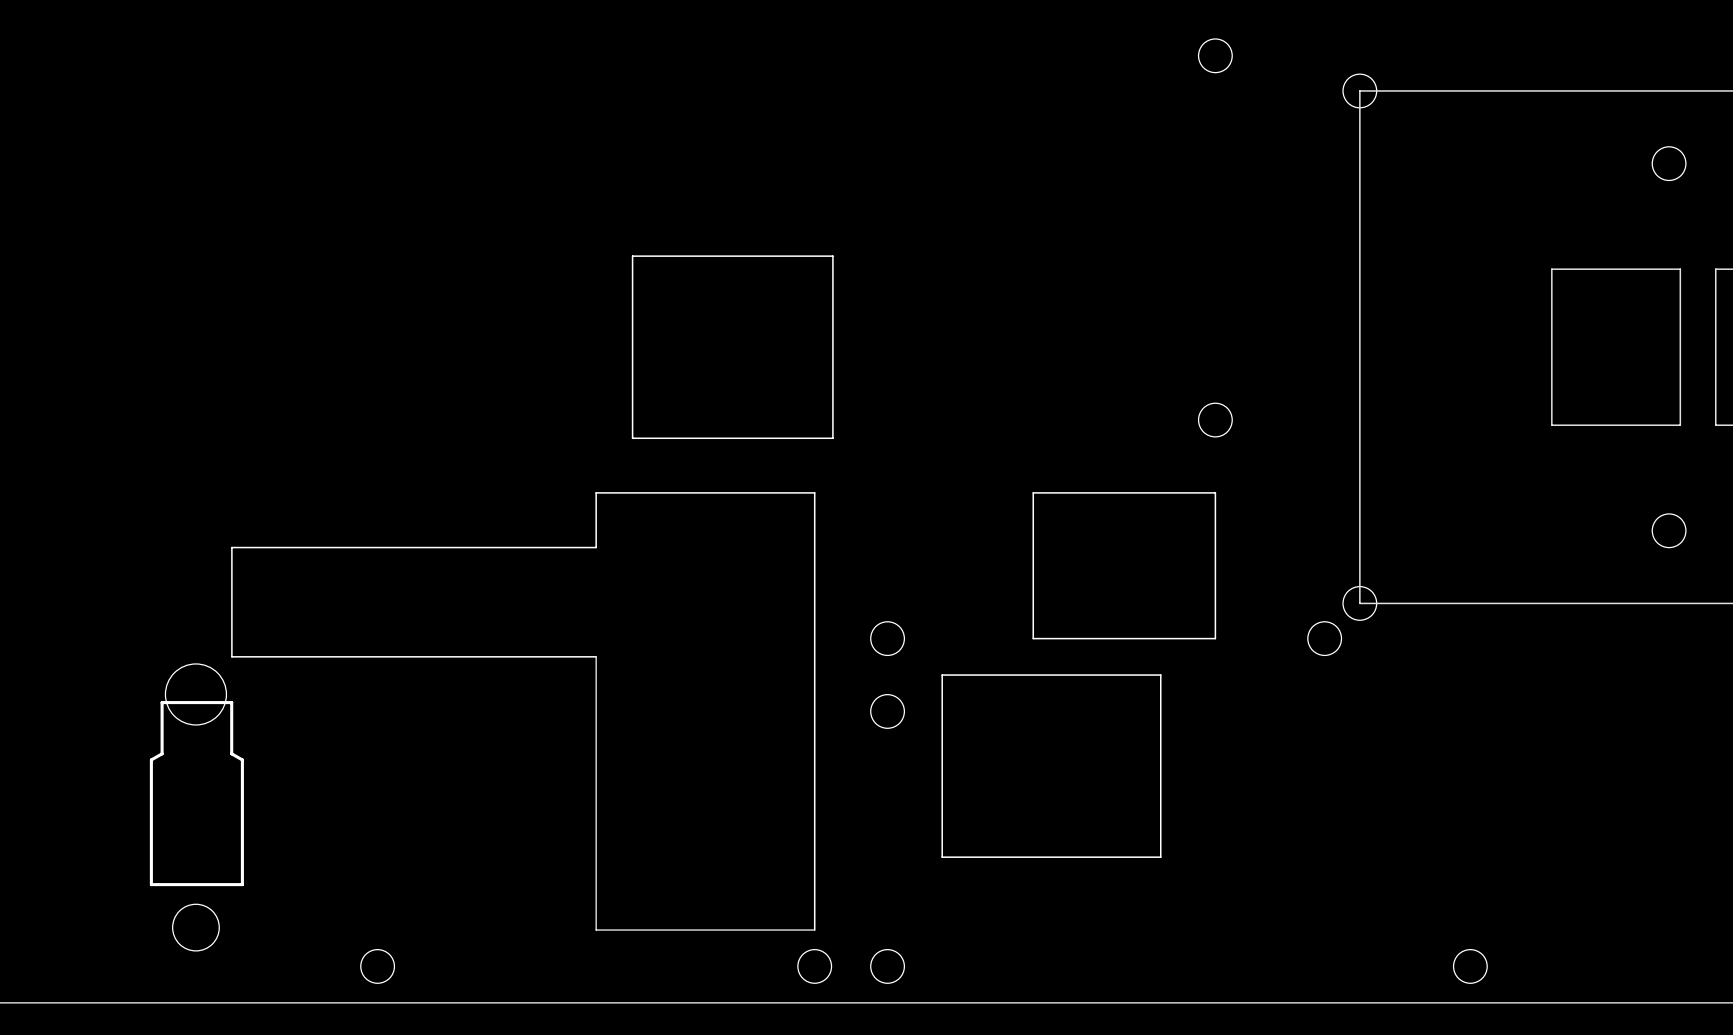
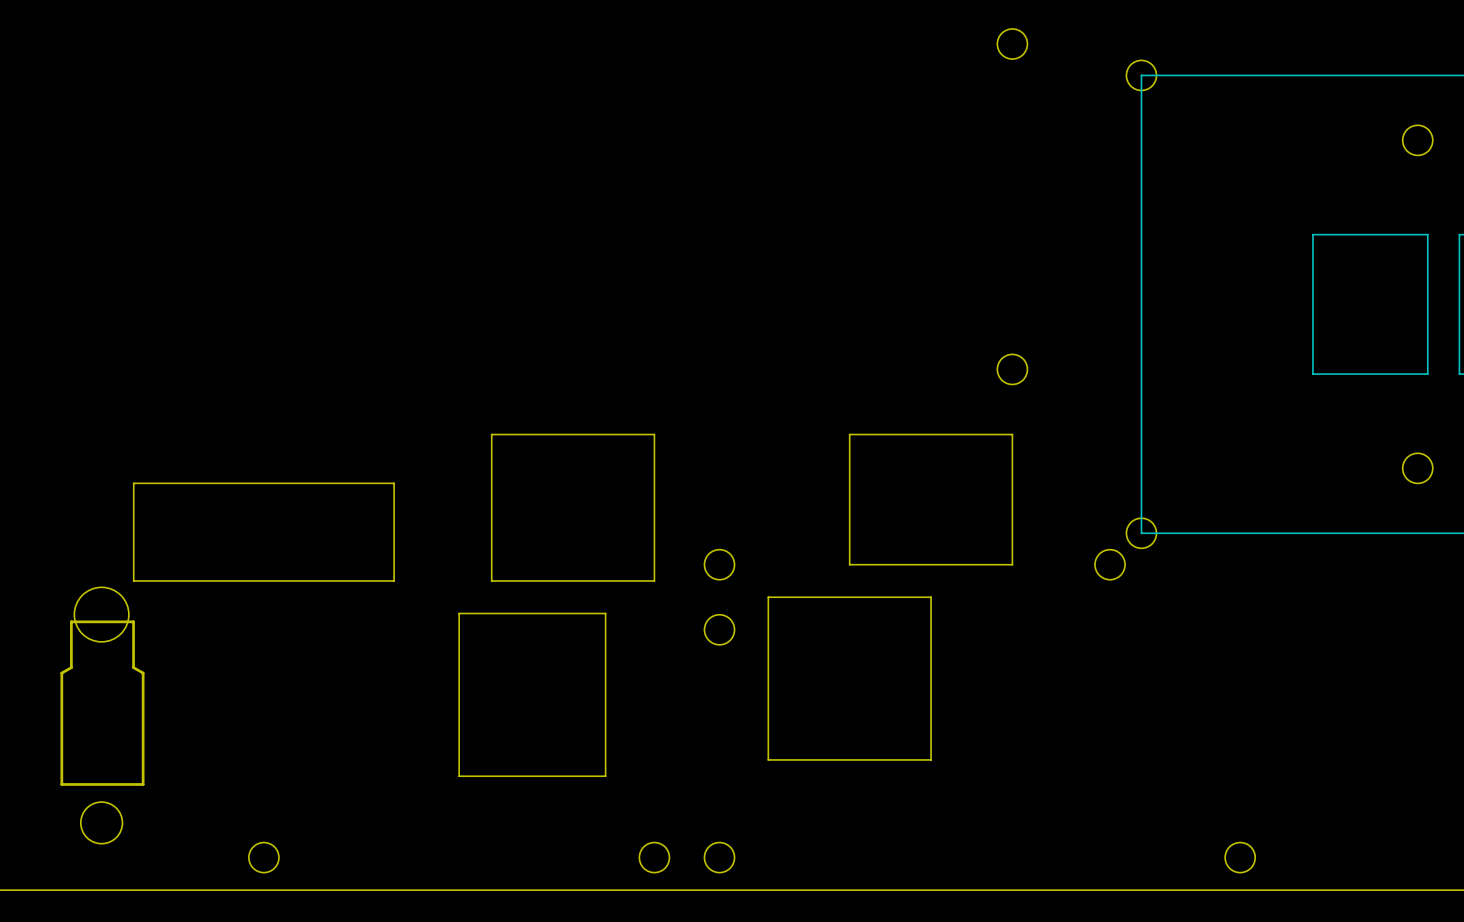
board edge: (632, 256) (832, 256) (832, 438) (632, 438) (632, 256) -> none
board edge: (632, 492) (596, 492) (596, 547) (523, 547) -> (394, 580) (394, 483)
board edge: (523, 656) (596, 656) (596, 930) (814, 930) (814, 656) -> (491, 434) (491, 580) (654, 580)
board edge: (1124, 675) (1160, 675) (1160, 857) (1124, 857) -> (931, 597) (931, 759)
board edge: none -> (459, 613) (459, 776) (605, 776) (605, 613) (459, 613)

